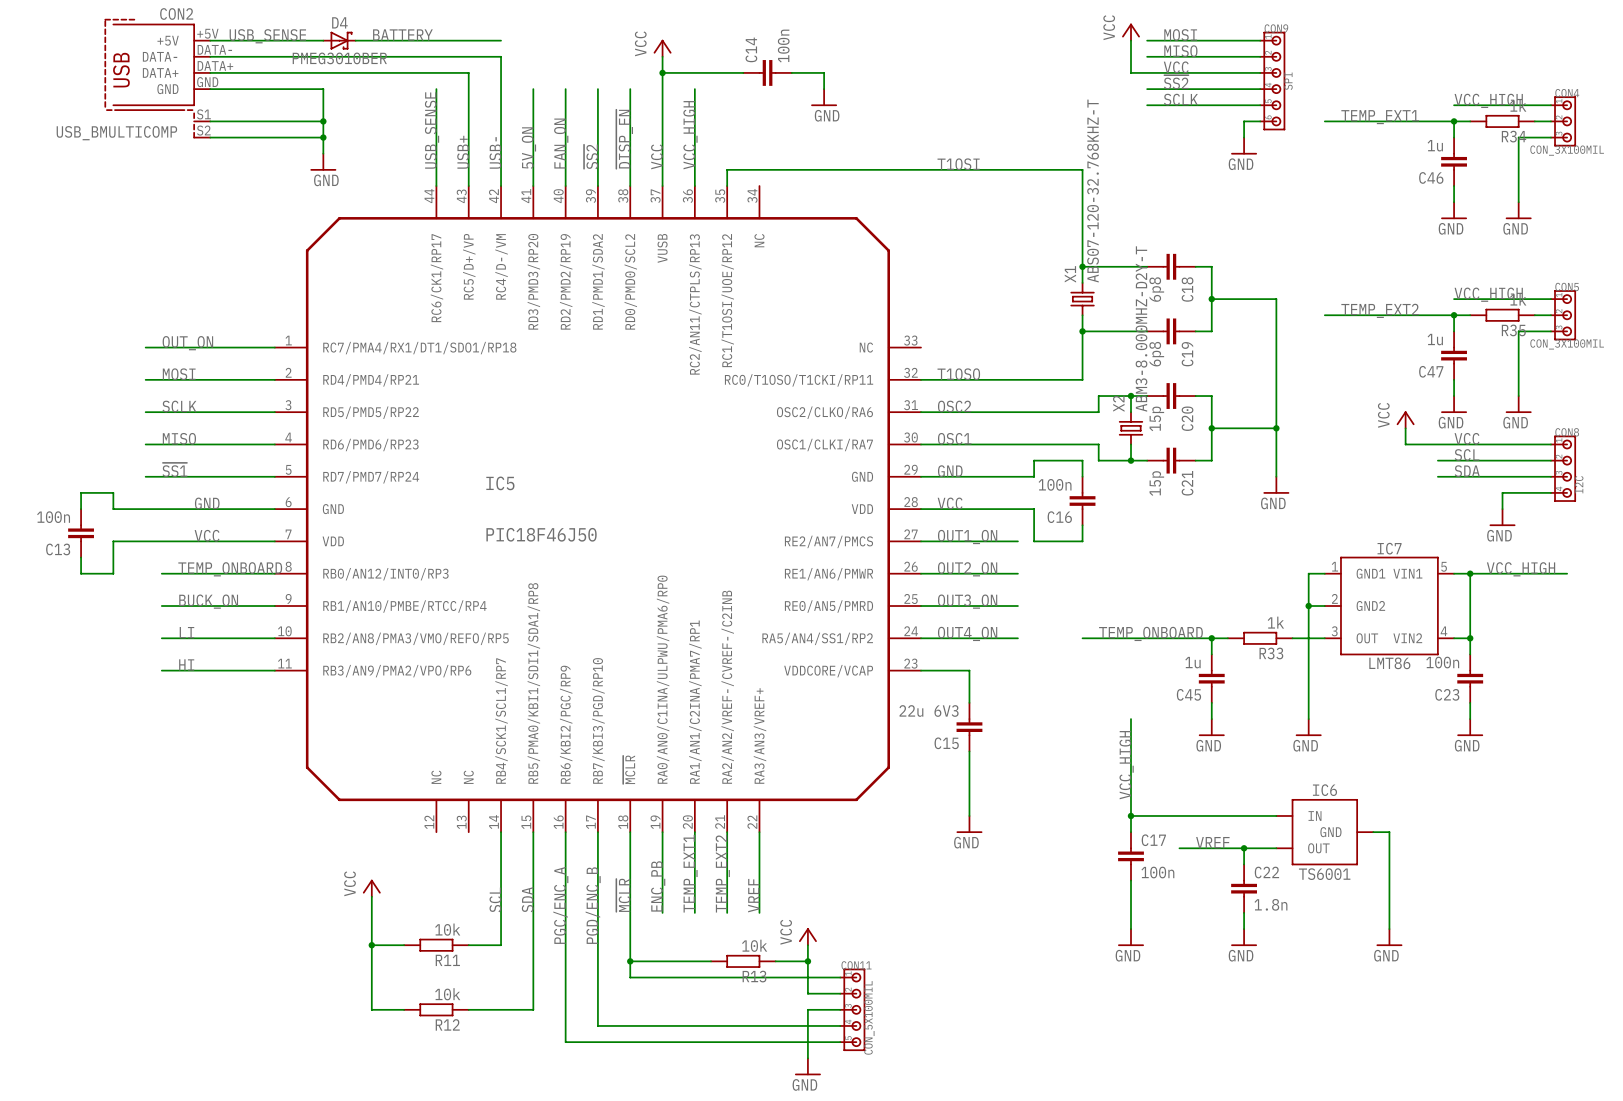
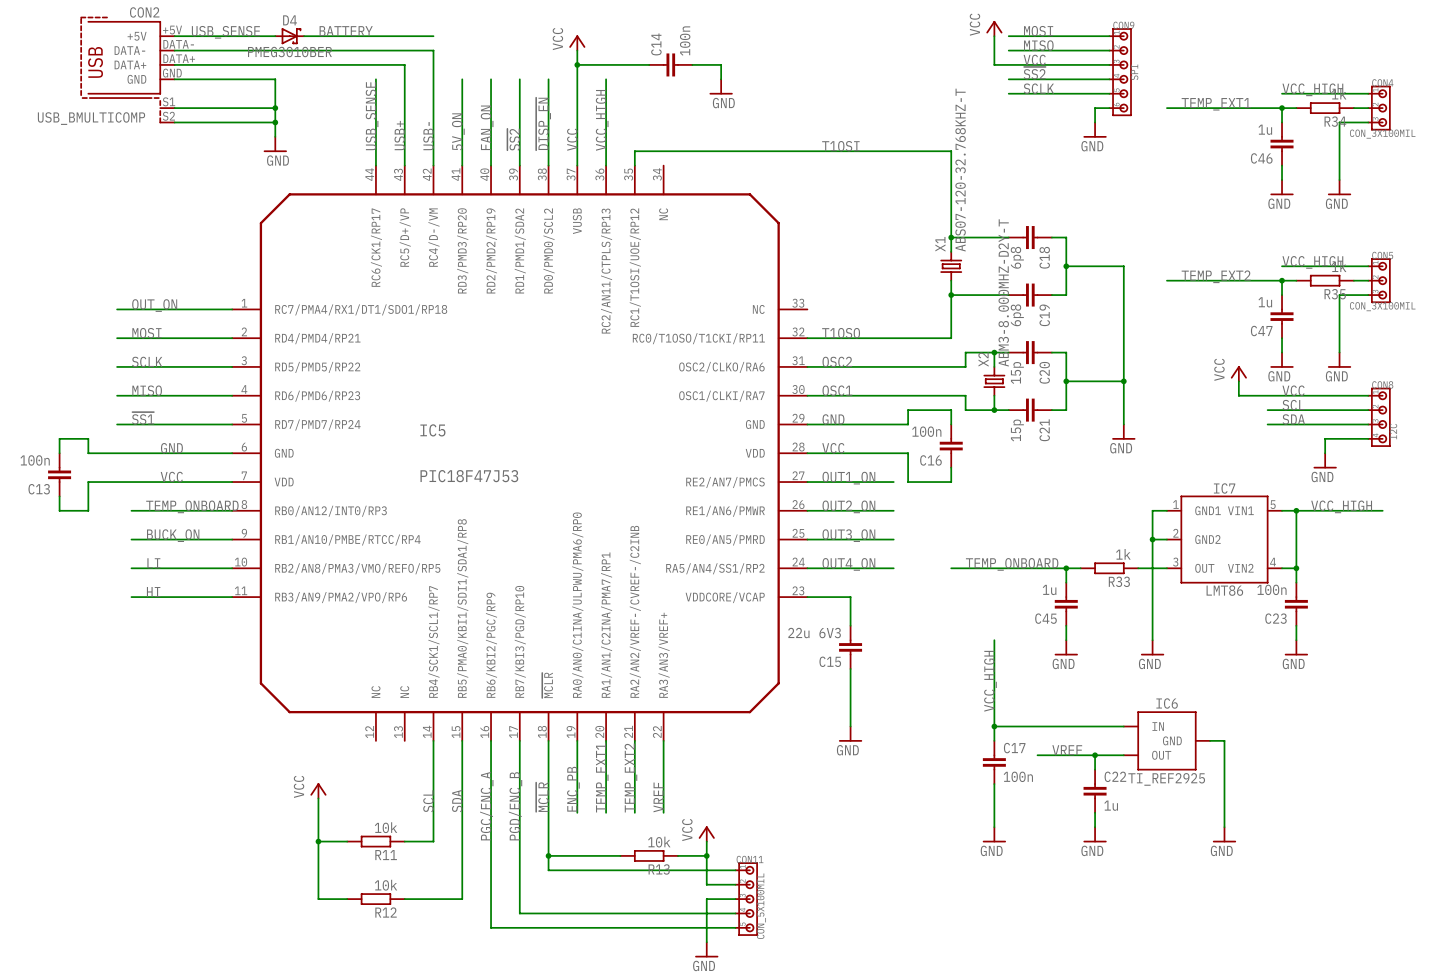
IC5 value: PIC18F46J50 (541, 534) -> PIC18F47J53 (469, 476)
IC6 value: TS6001 (1324, 874) -> TI_REF2925 (1166, 779)
C22 value: 1.8n (1270, 904) -> 1u (1111, 805)

